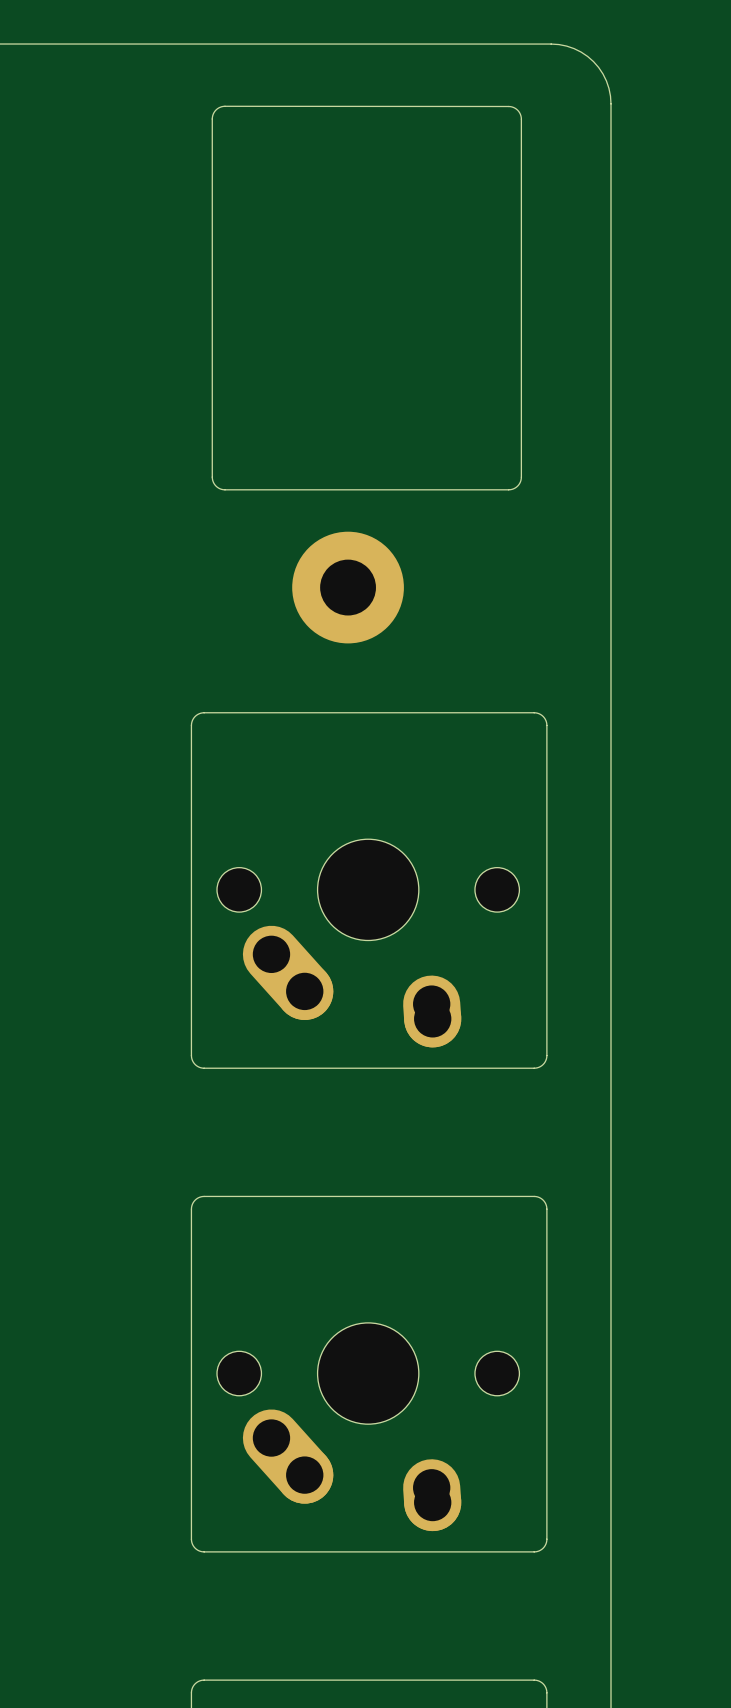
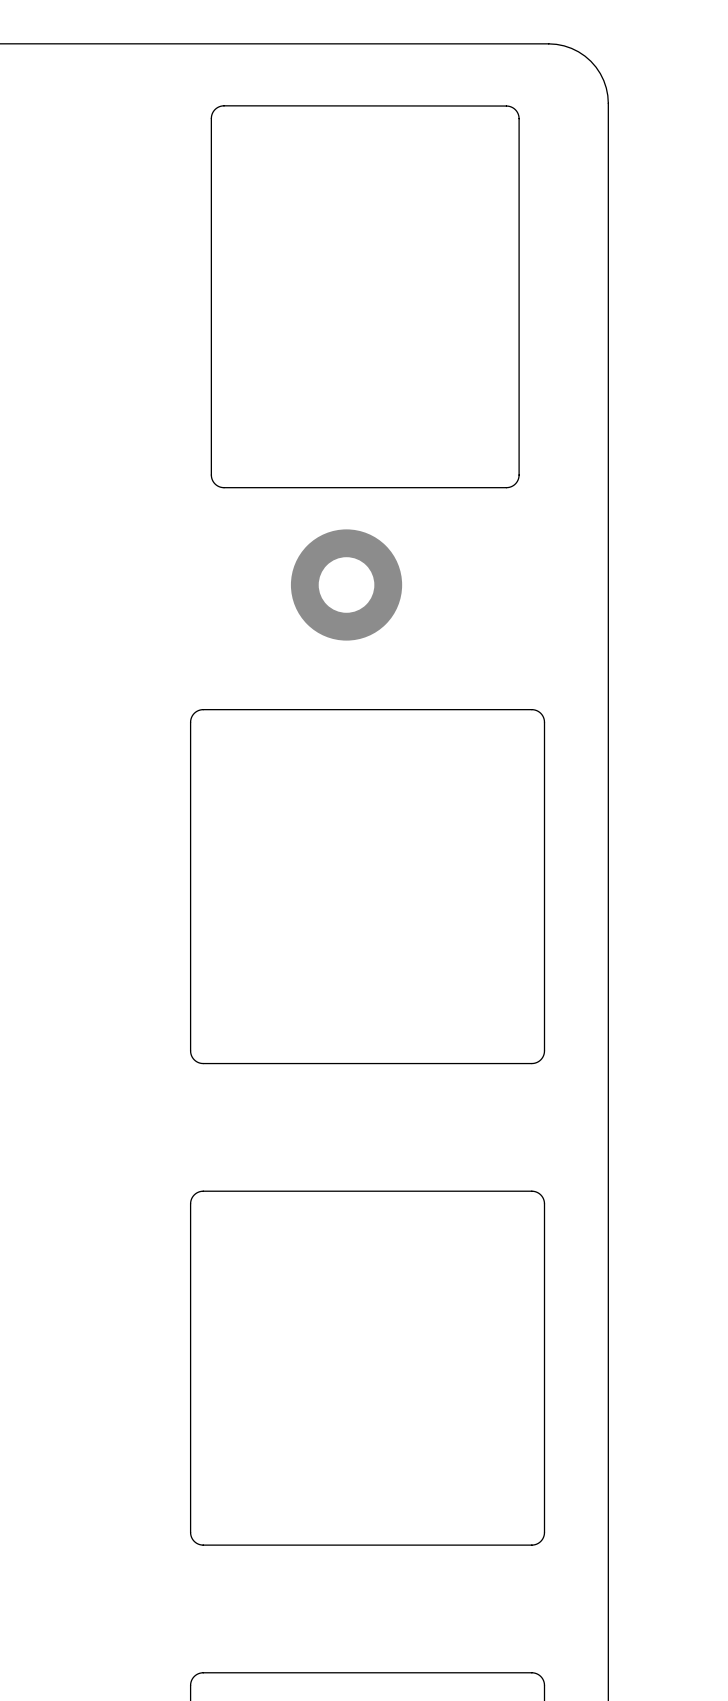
part: (368, 943) -> none
part: (368, 1427) -> none

